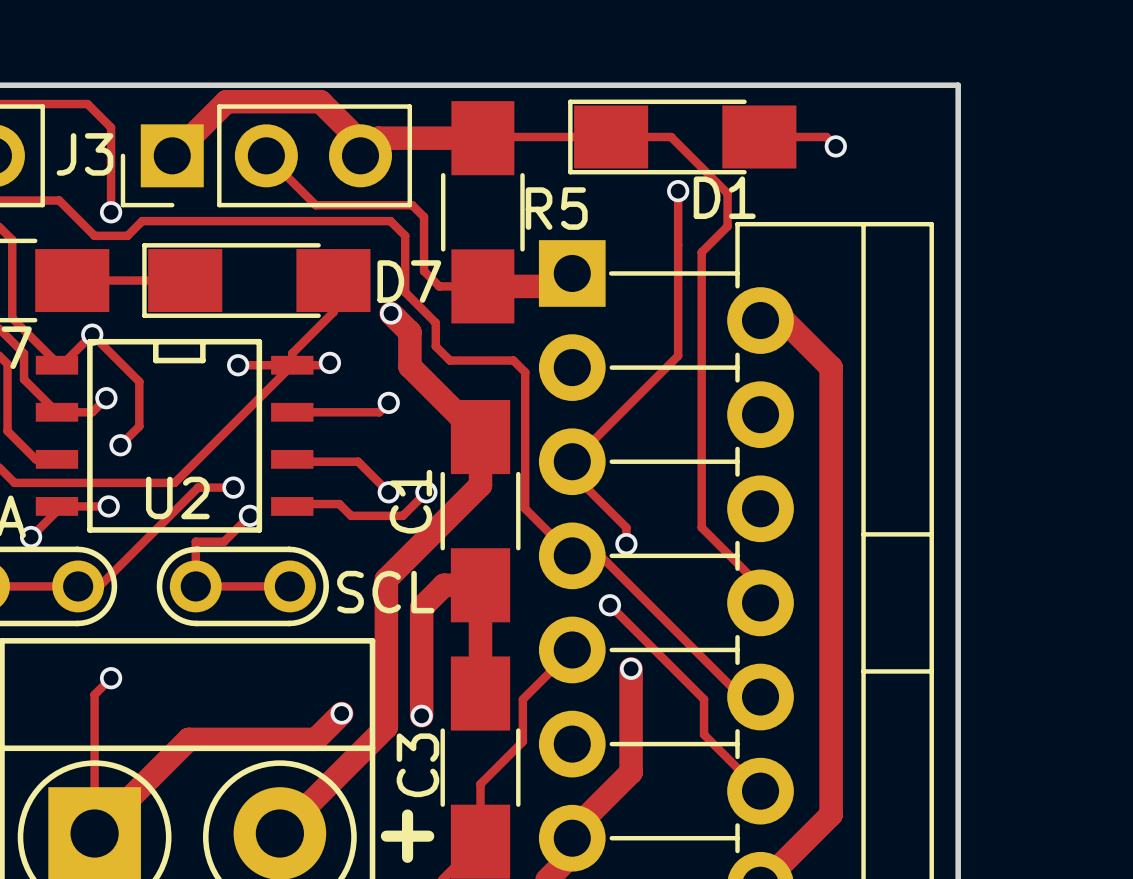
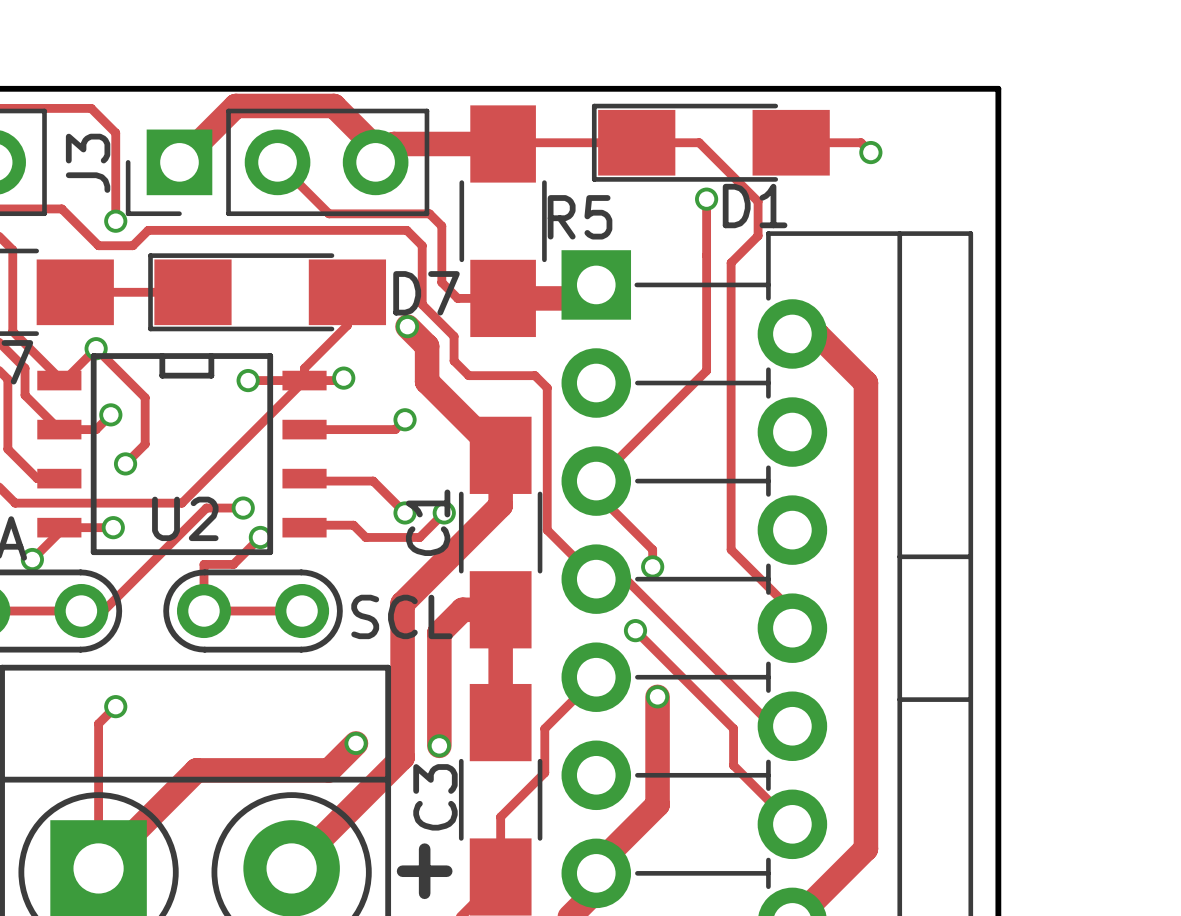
J3 name rotation: 0° (85, 154) -> 90° counterclockwise (88, 163)

